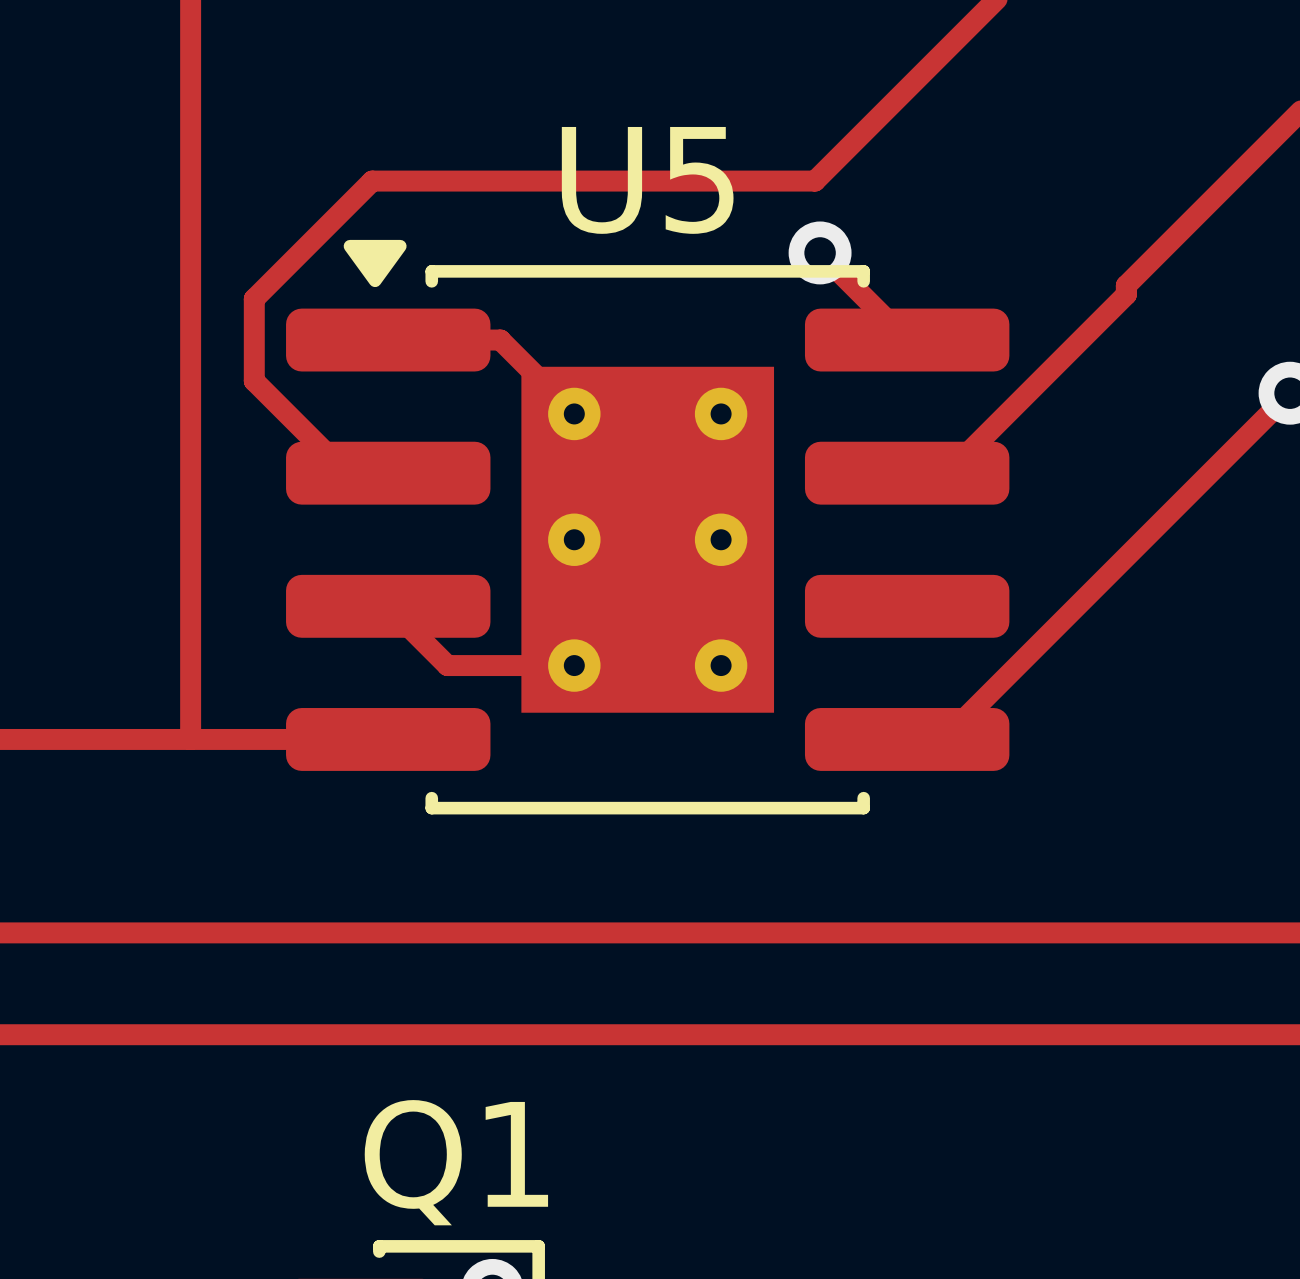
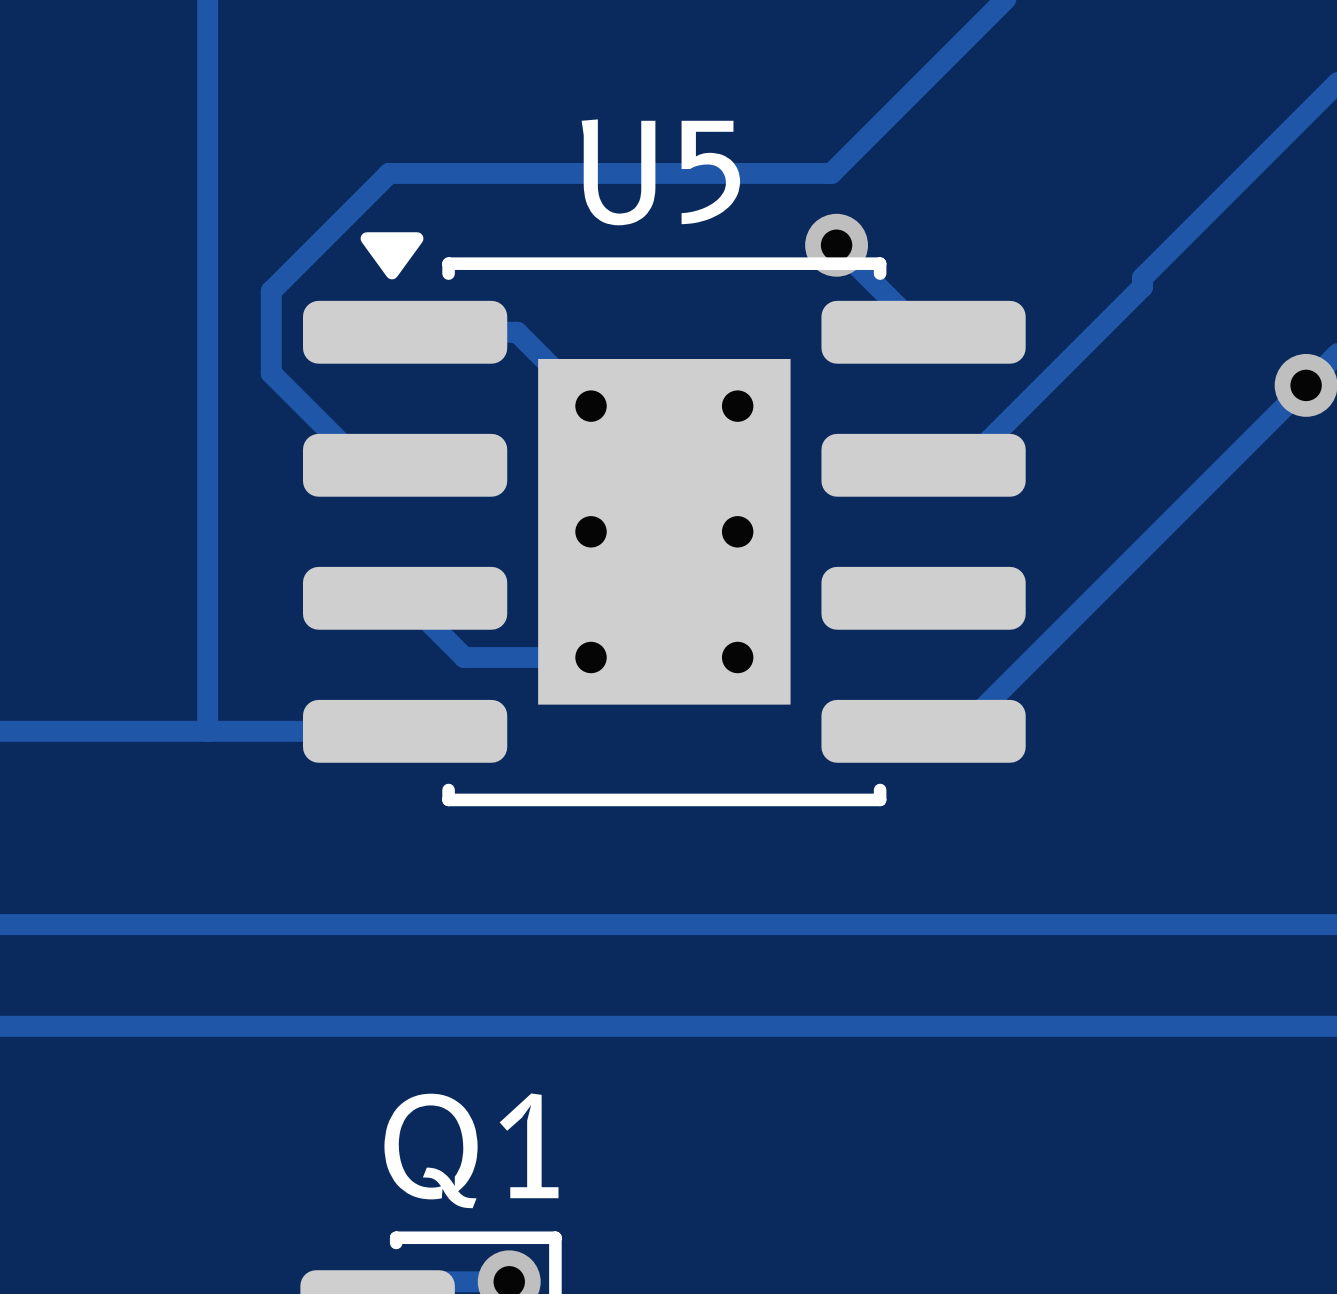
U5 footprint: [286, 239, 1010, 815] -> [302, 232, 1026, 807]

